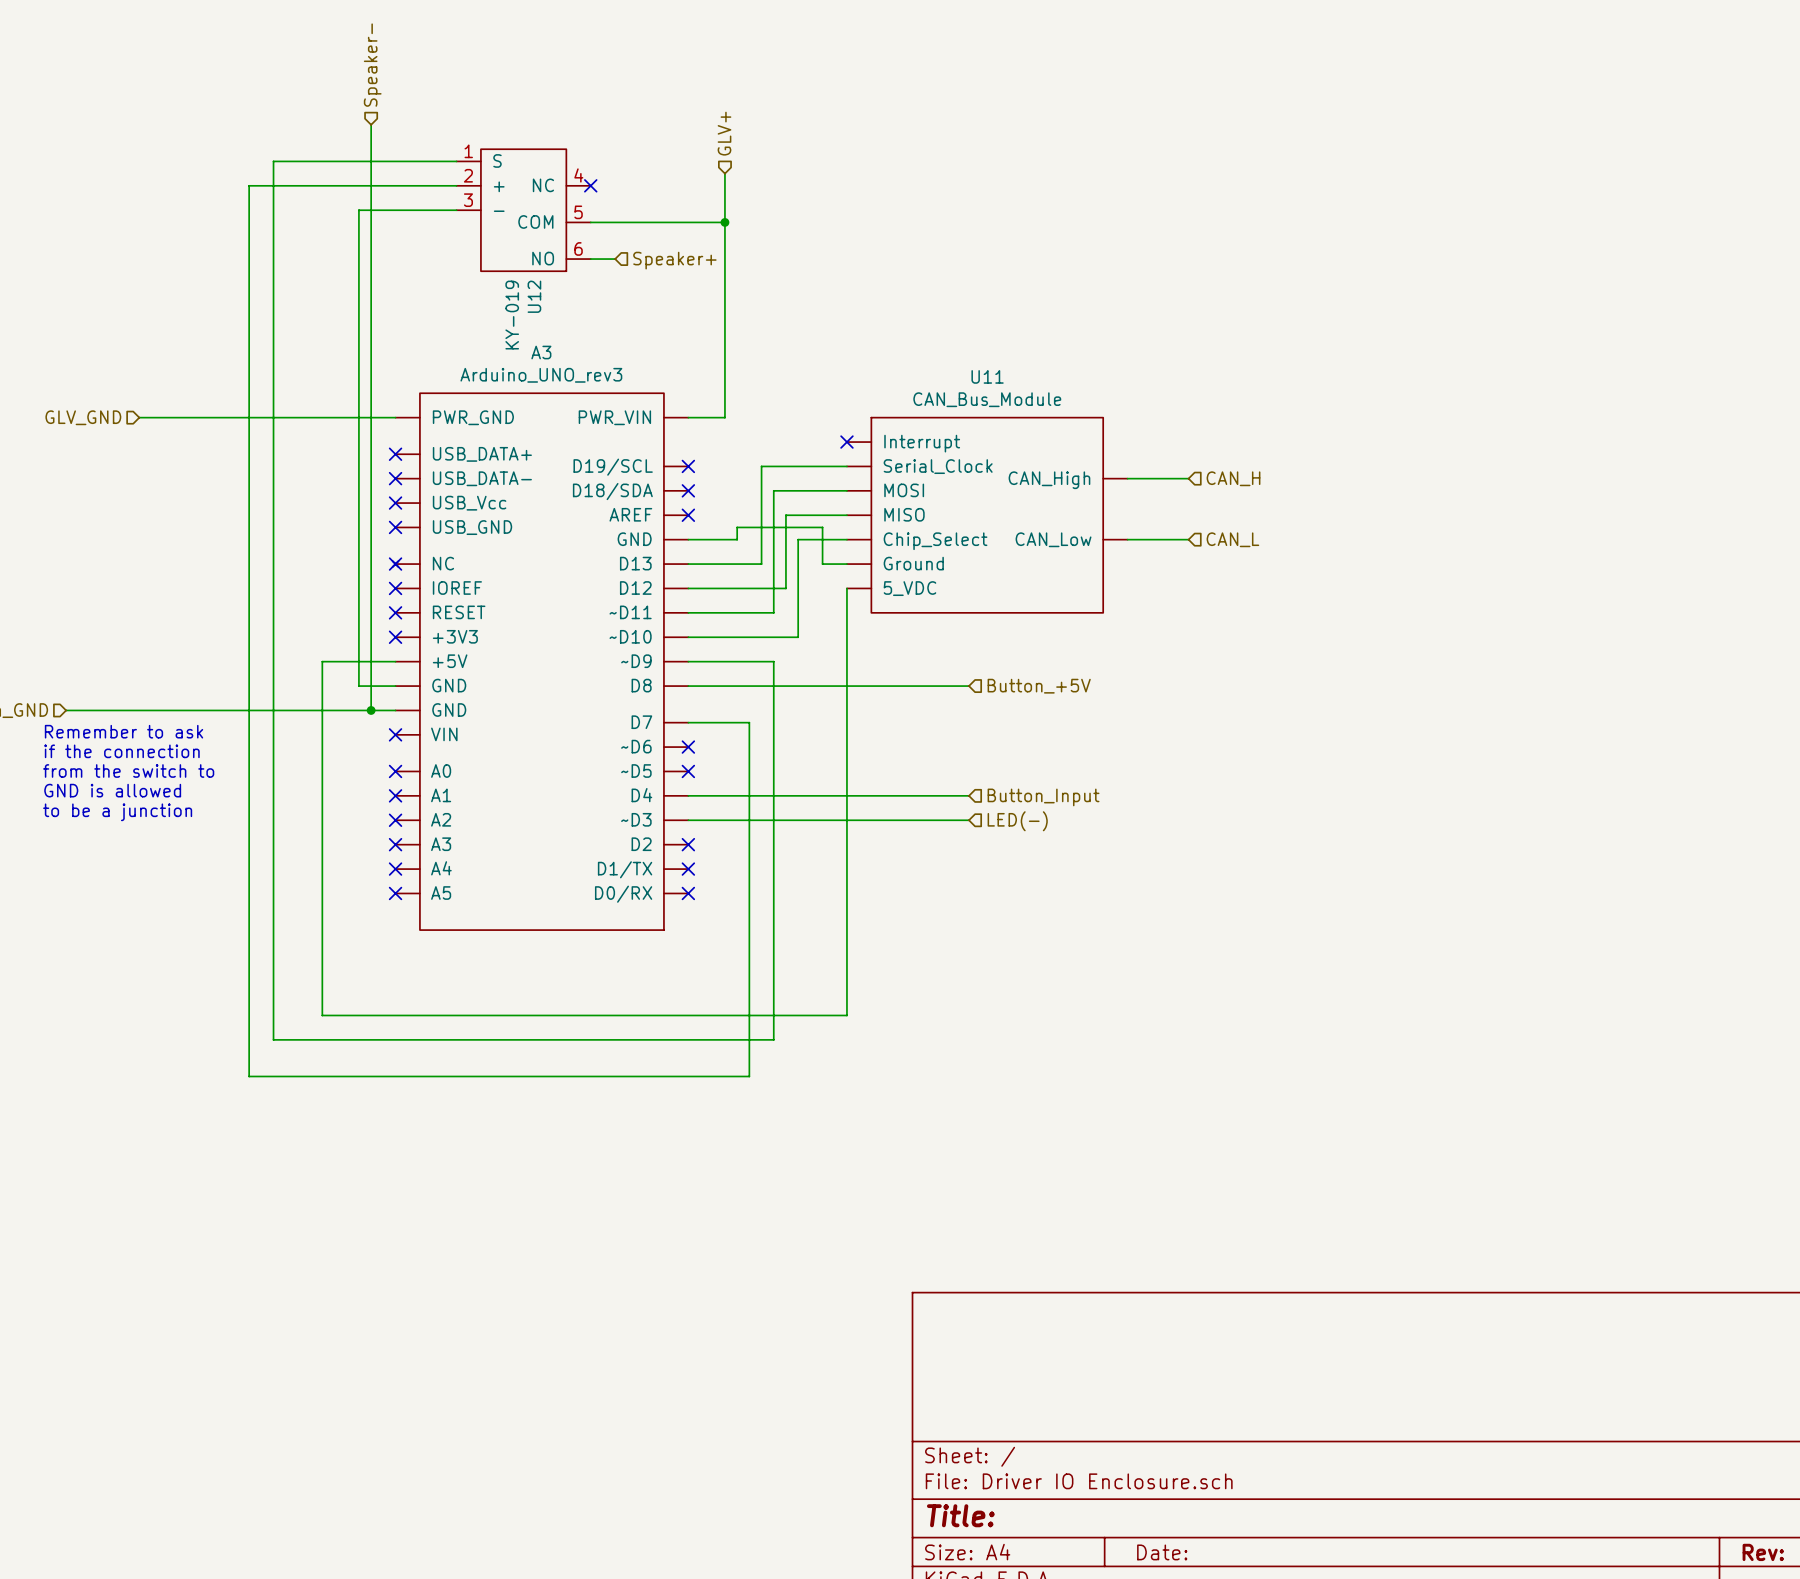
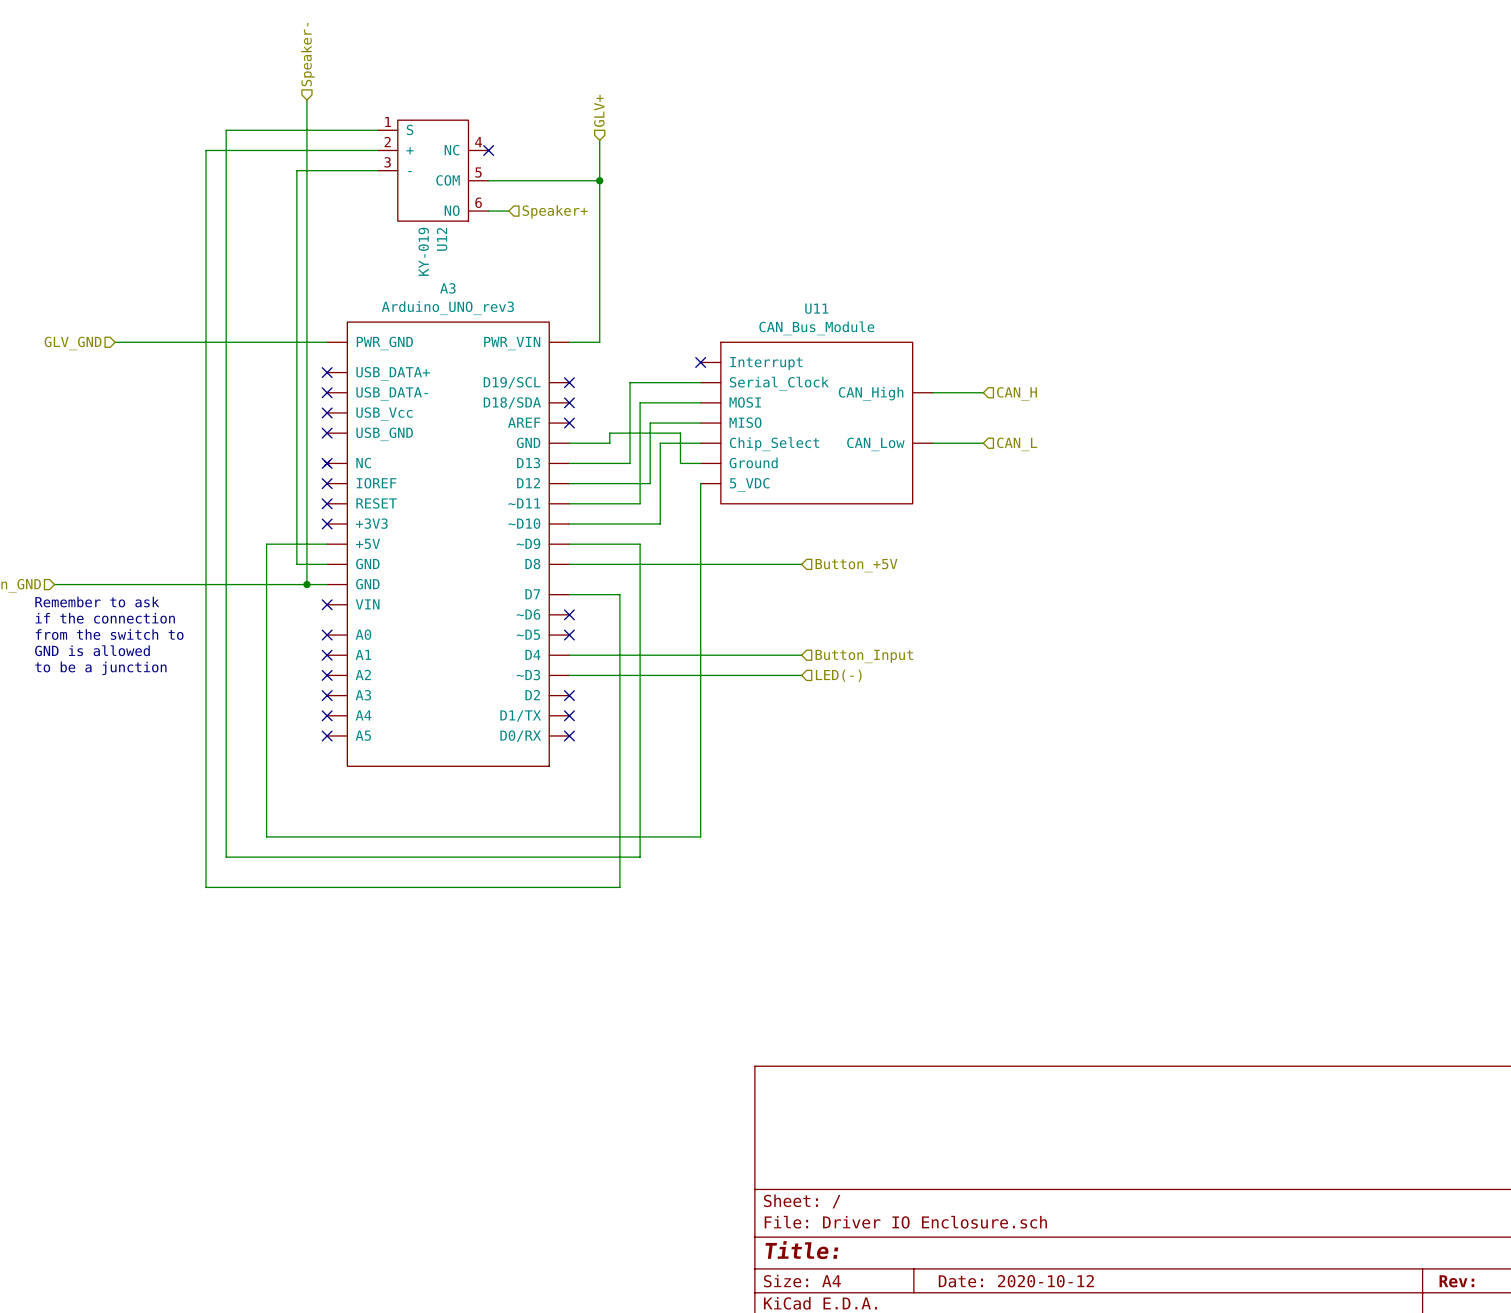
title block: Date: (1162, 1552) -> Date: 2020-10-12 (1016, 1281)

